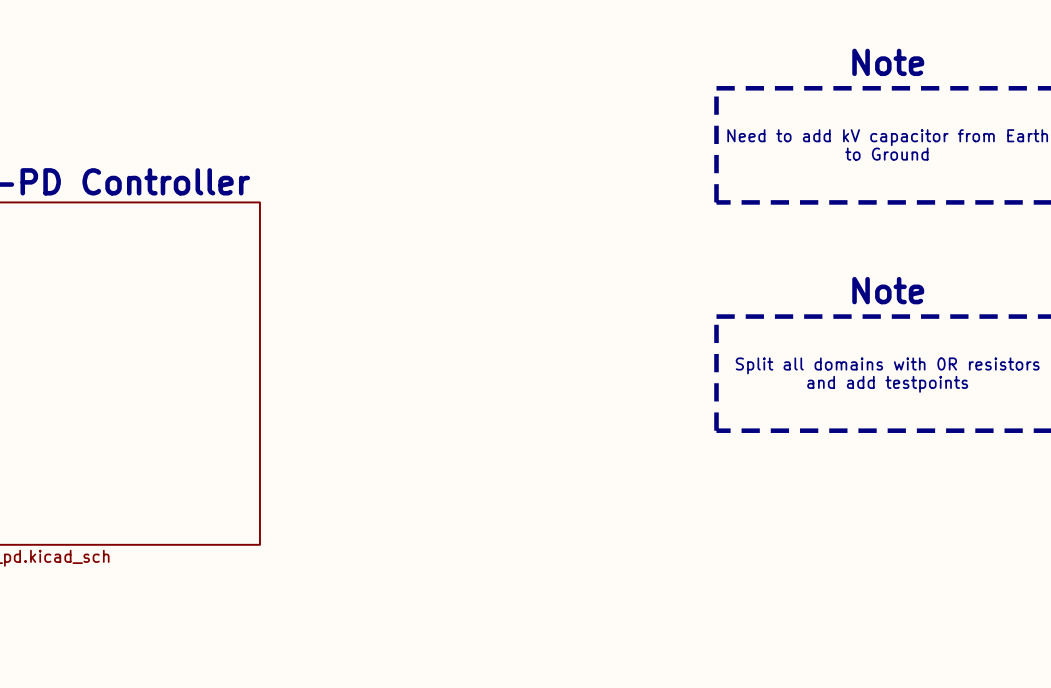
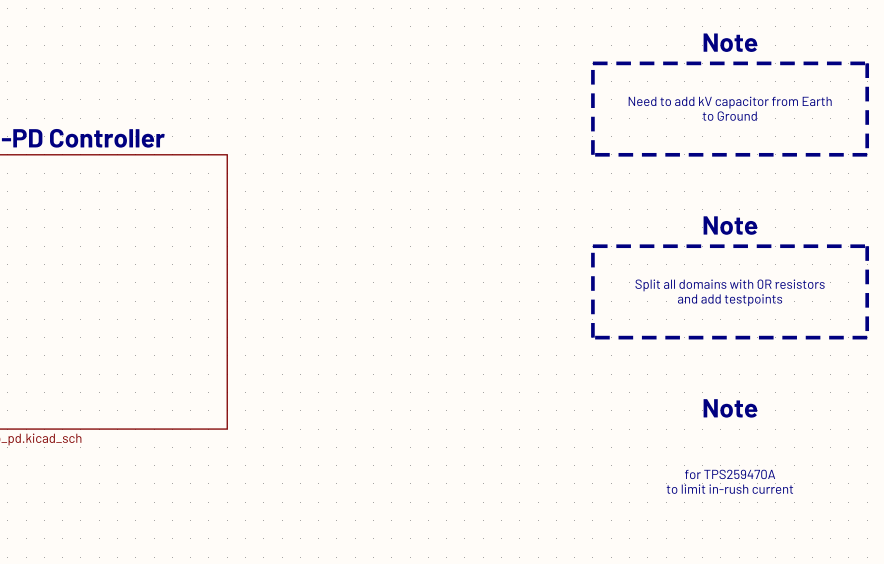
text: none -> Note (730, 408)
text: none -> for TPS259470A (730, 474)
text: none -> to limit in-rush current (729, 489)

